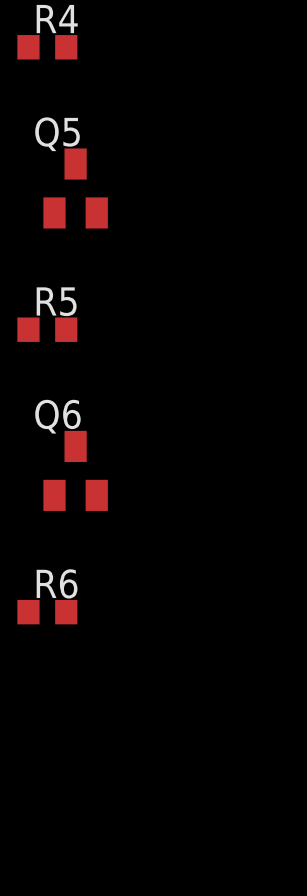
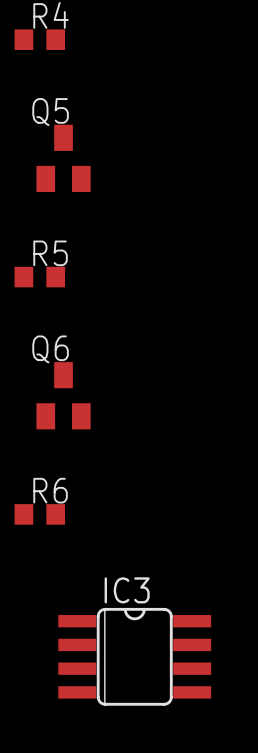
IC3: none -> (134, 656)

